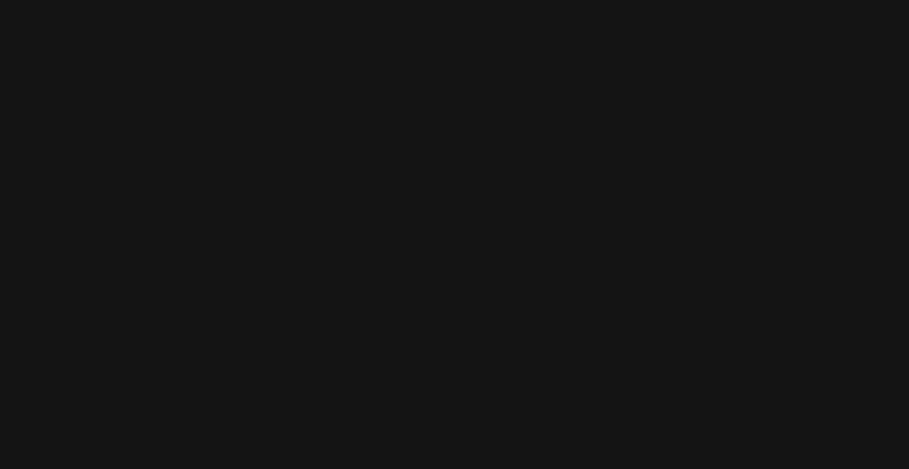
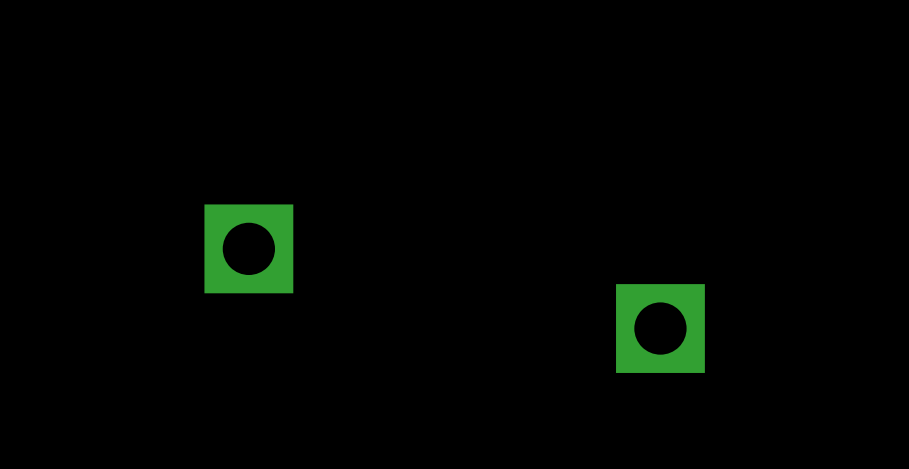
part: none -> (248, 248)
part: none -> (660, 328)

